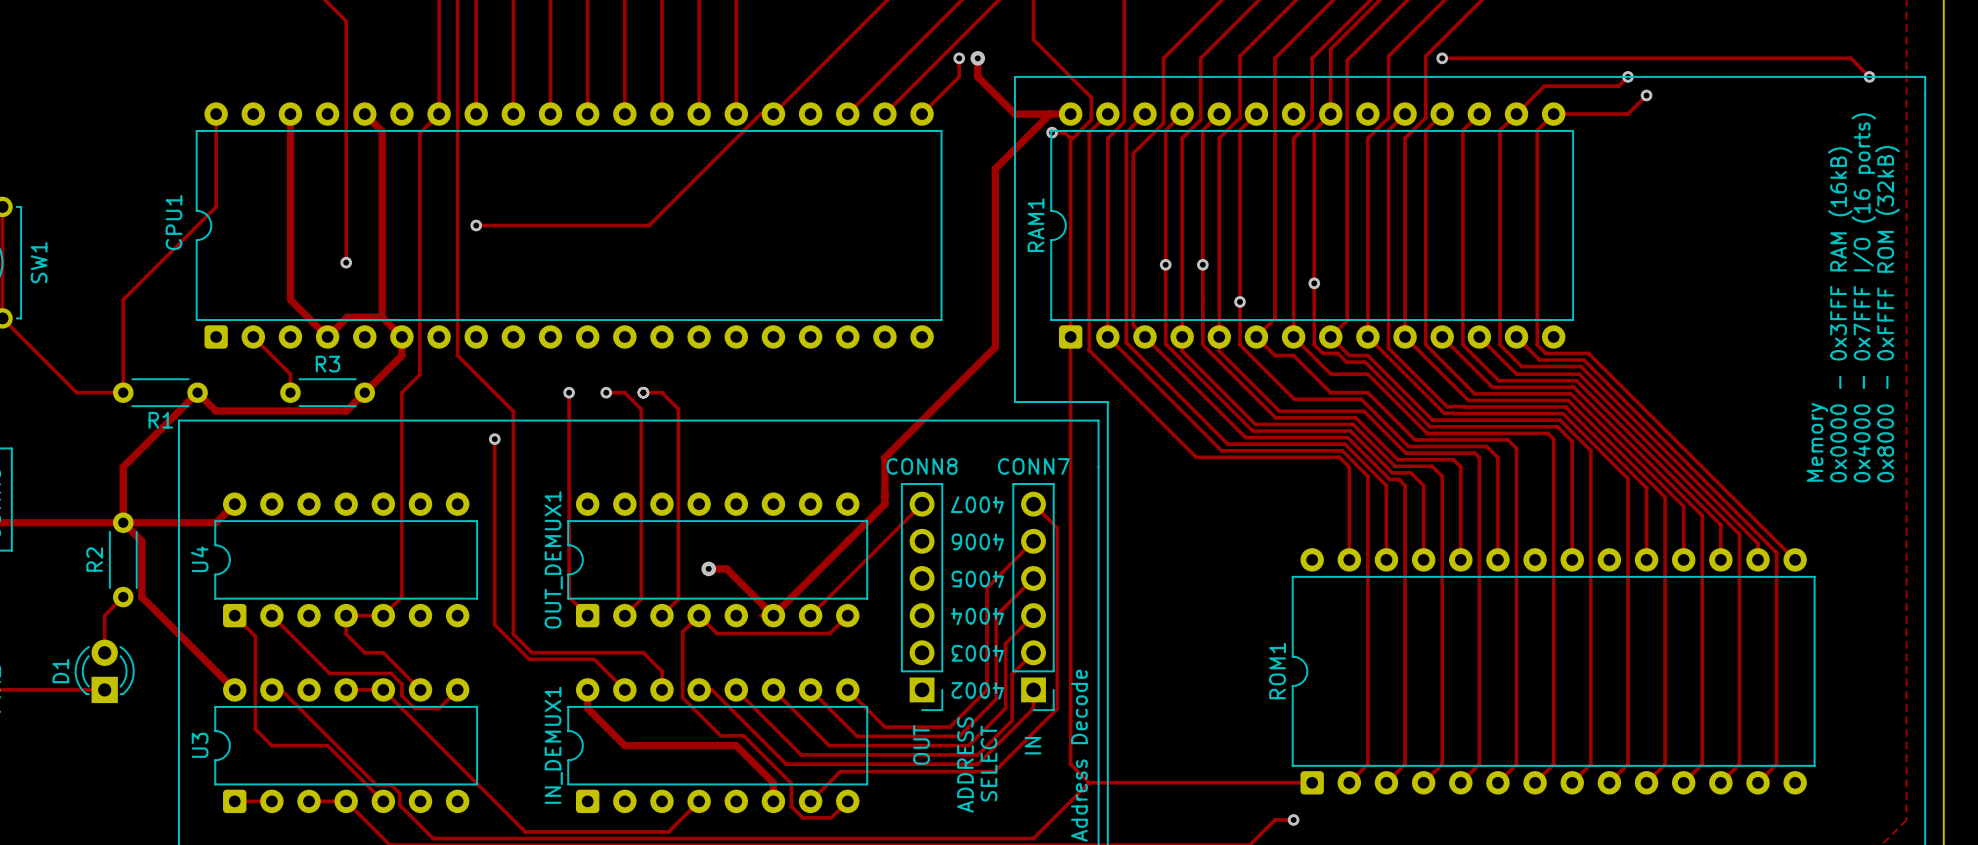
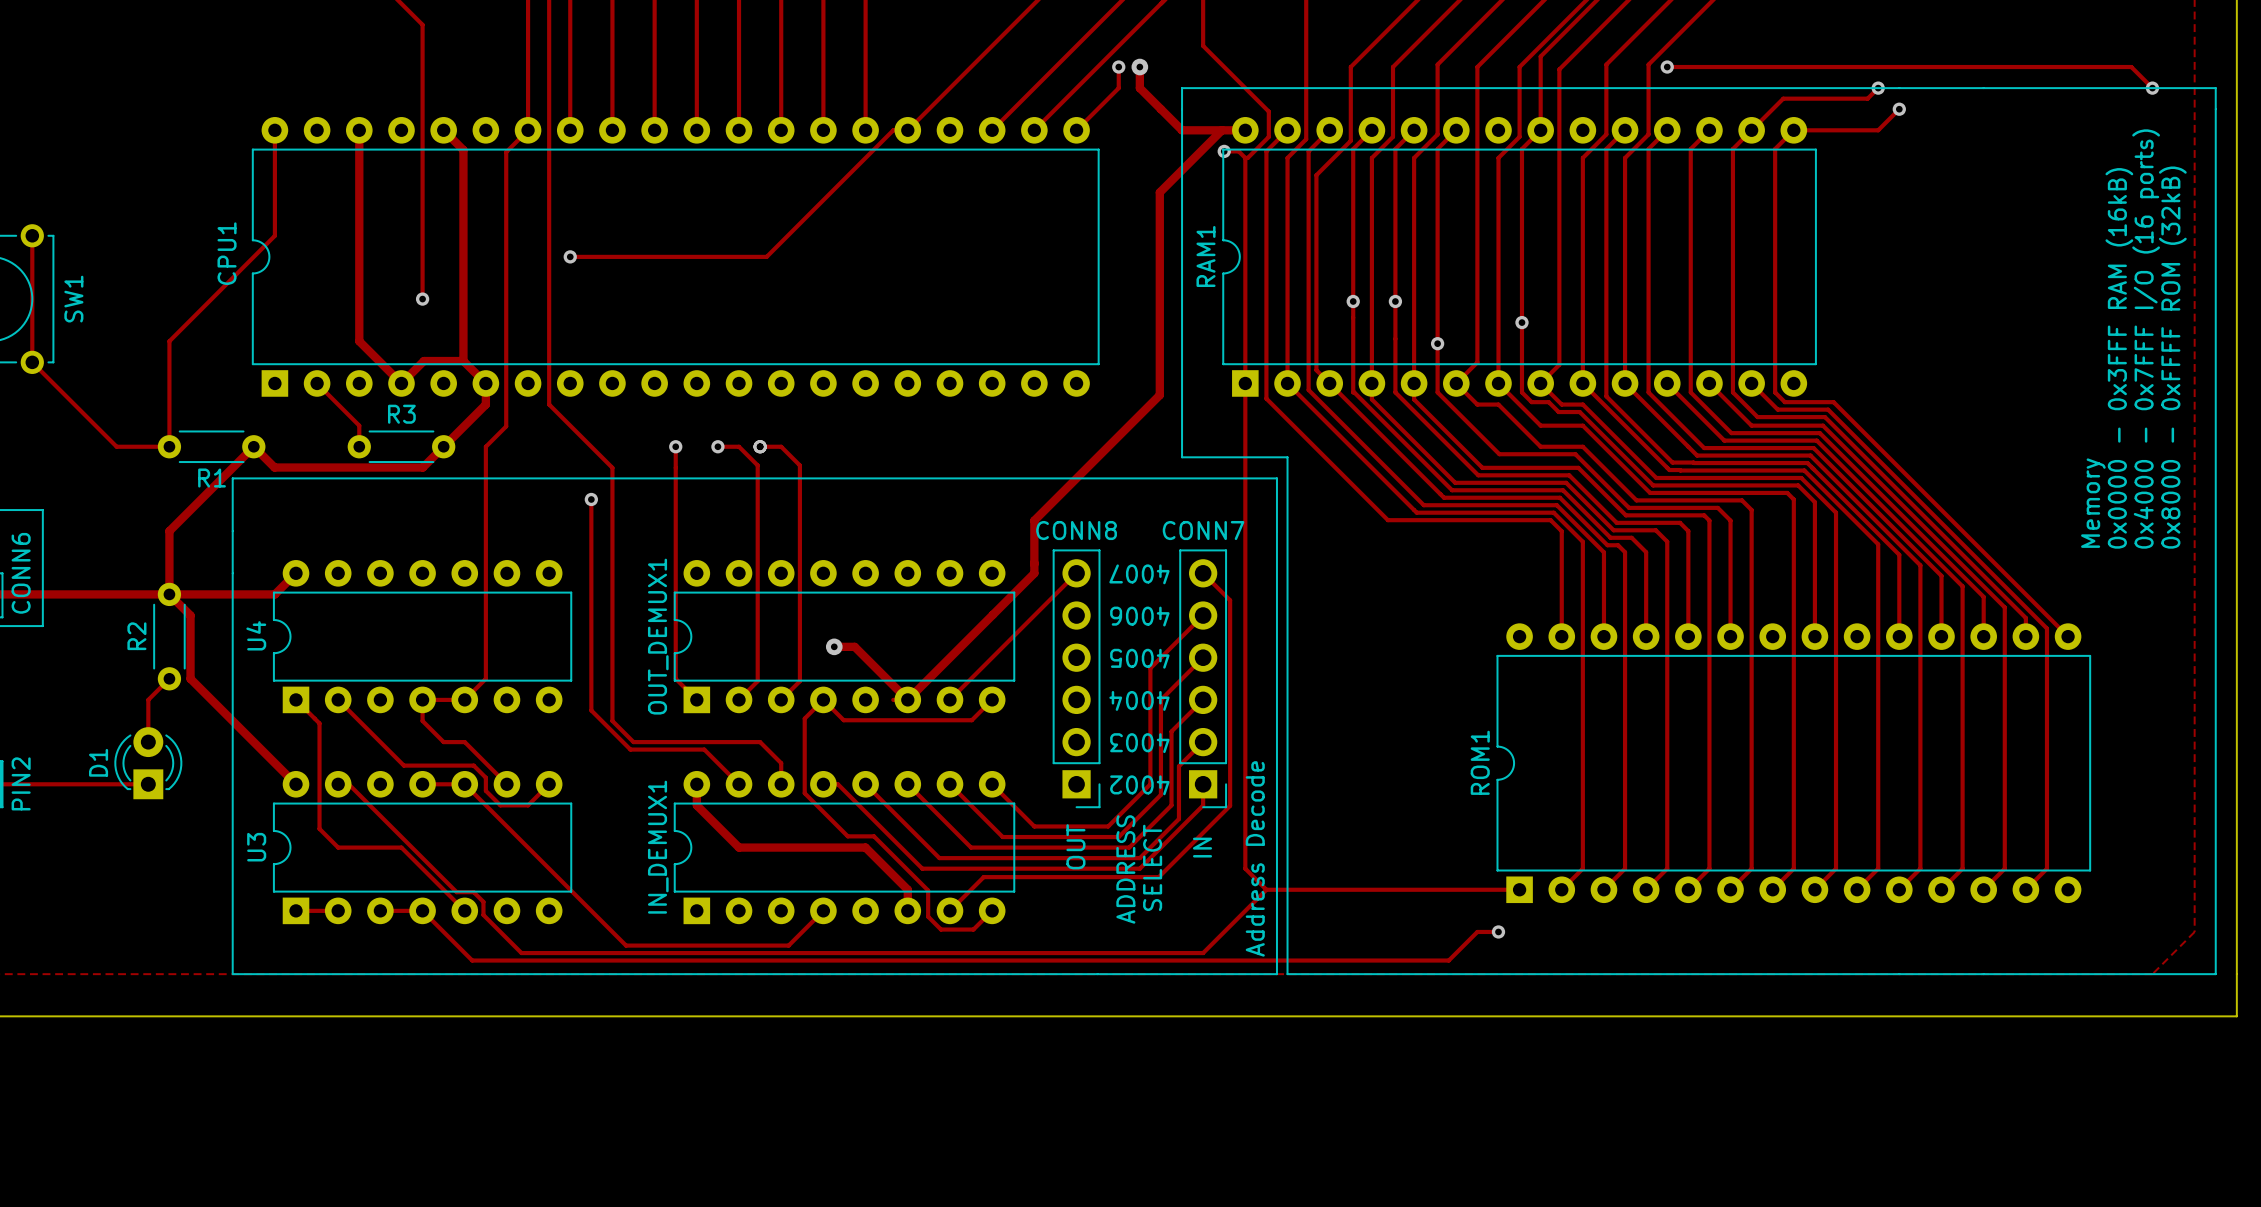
CPU1 footprint: [195, 102, 943, 349] -> [251, 117, 1100, 397]
RAM1 footprint: [1050, 102, 1575, 349] -> [1222, 117, 1817, 397]
U4 footprint: [214, 492, 478, 628] -> [272, 560, 573, 714]
OUT_DEMUX1 footprint: [567, 492, 869, 628] -> [673, 560, 1016, 714]
ROM1 footprint: [1291, 548, 1816, 795] -> [1496, 623, 2092, 904]
U3 footprint: [214, 678, 478, 814] -> [272, 771, 573, 925]
IN_DEMUX1 footprint: [567, 678, 869, 814] -> [673, 771, 1016, 925]

